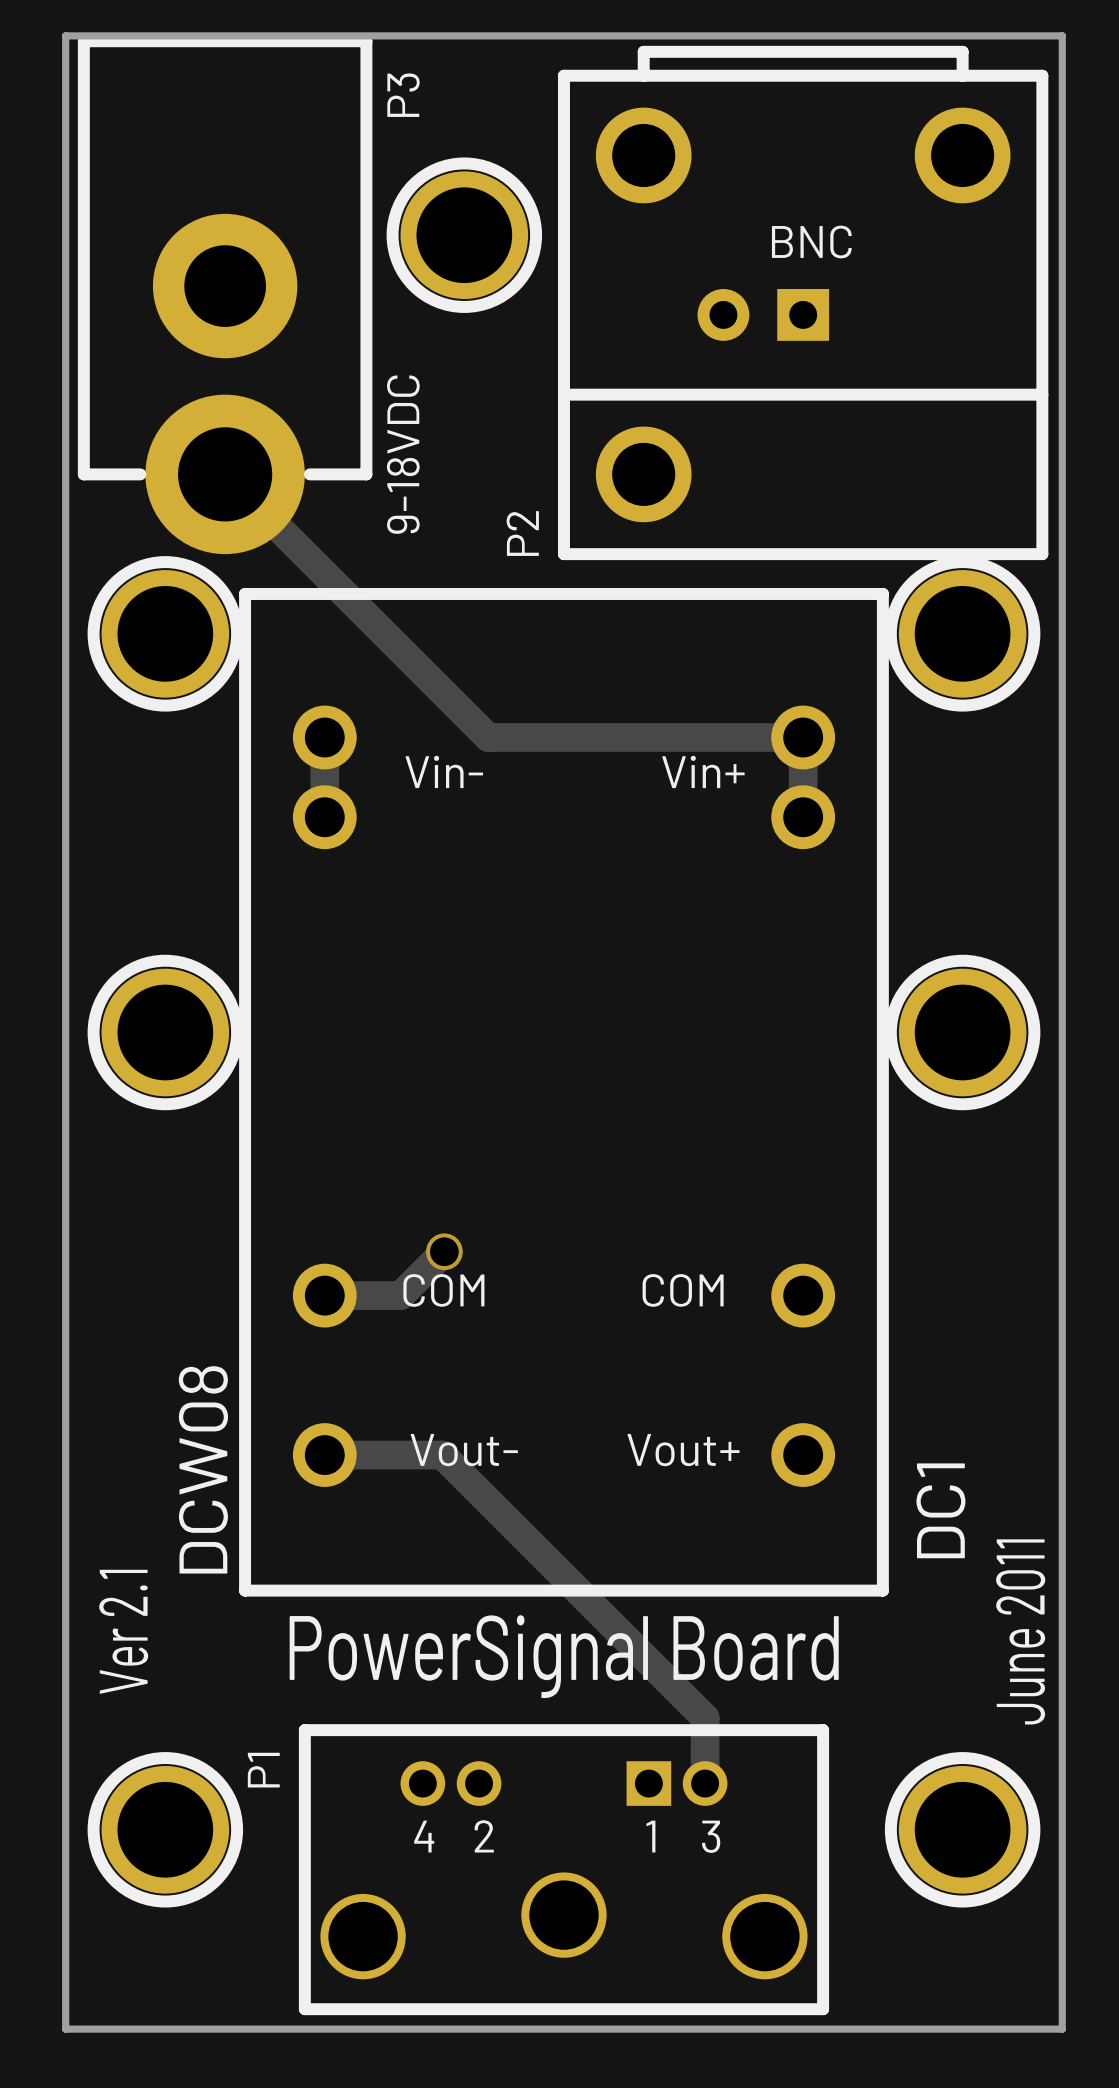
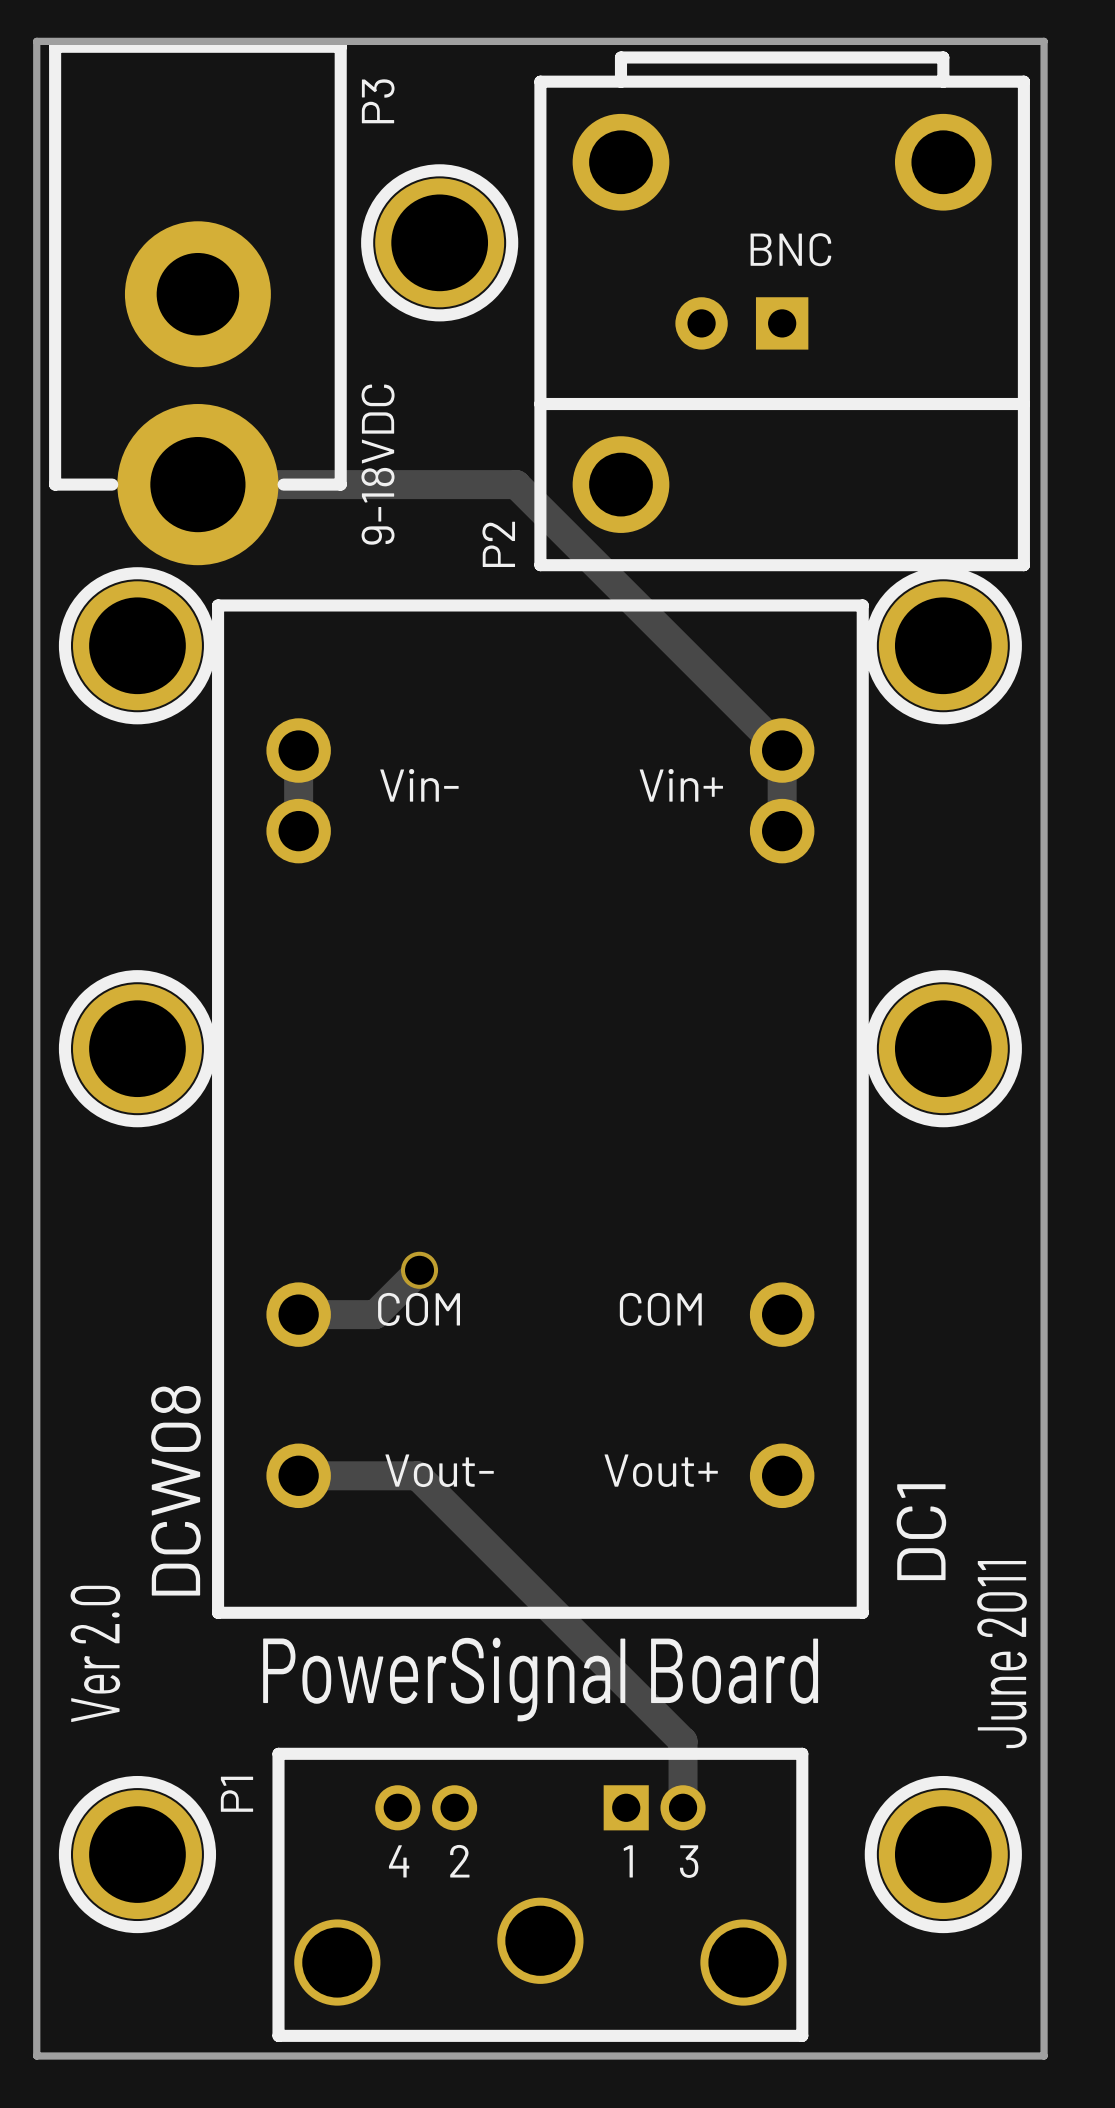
track: (225, 474) (488, 737) (803, 737) -> (197, 484) (516, 484) (782, 750)
text: Ver 2.1 (123, 1631) -> Ver 2.0 (95, 1653)

